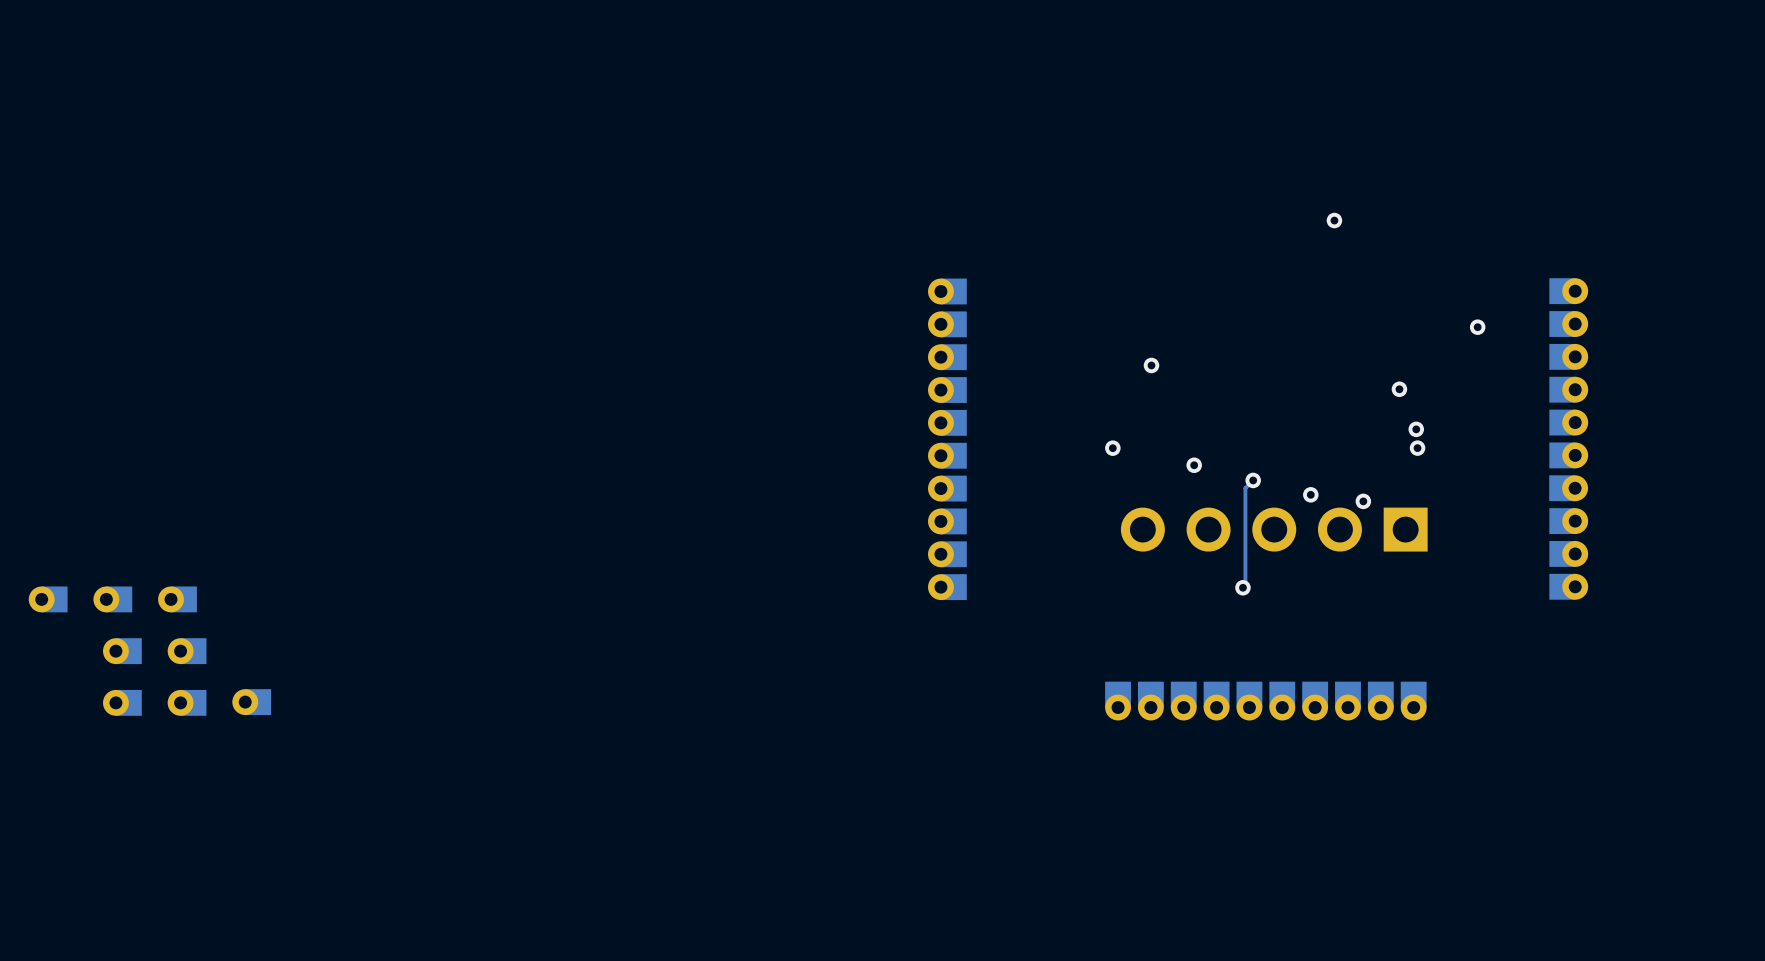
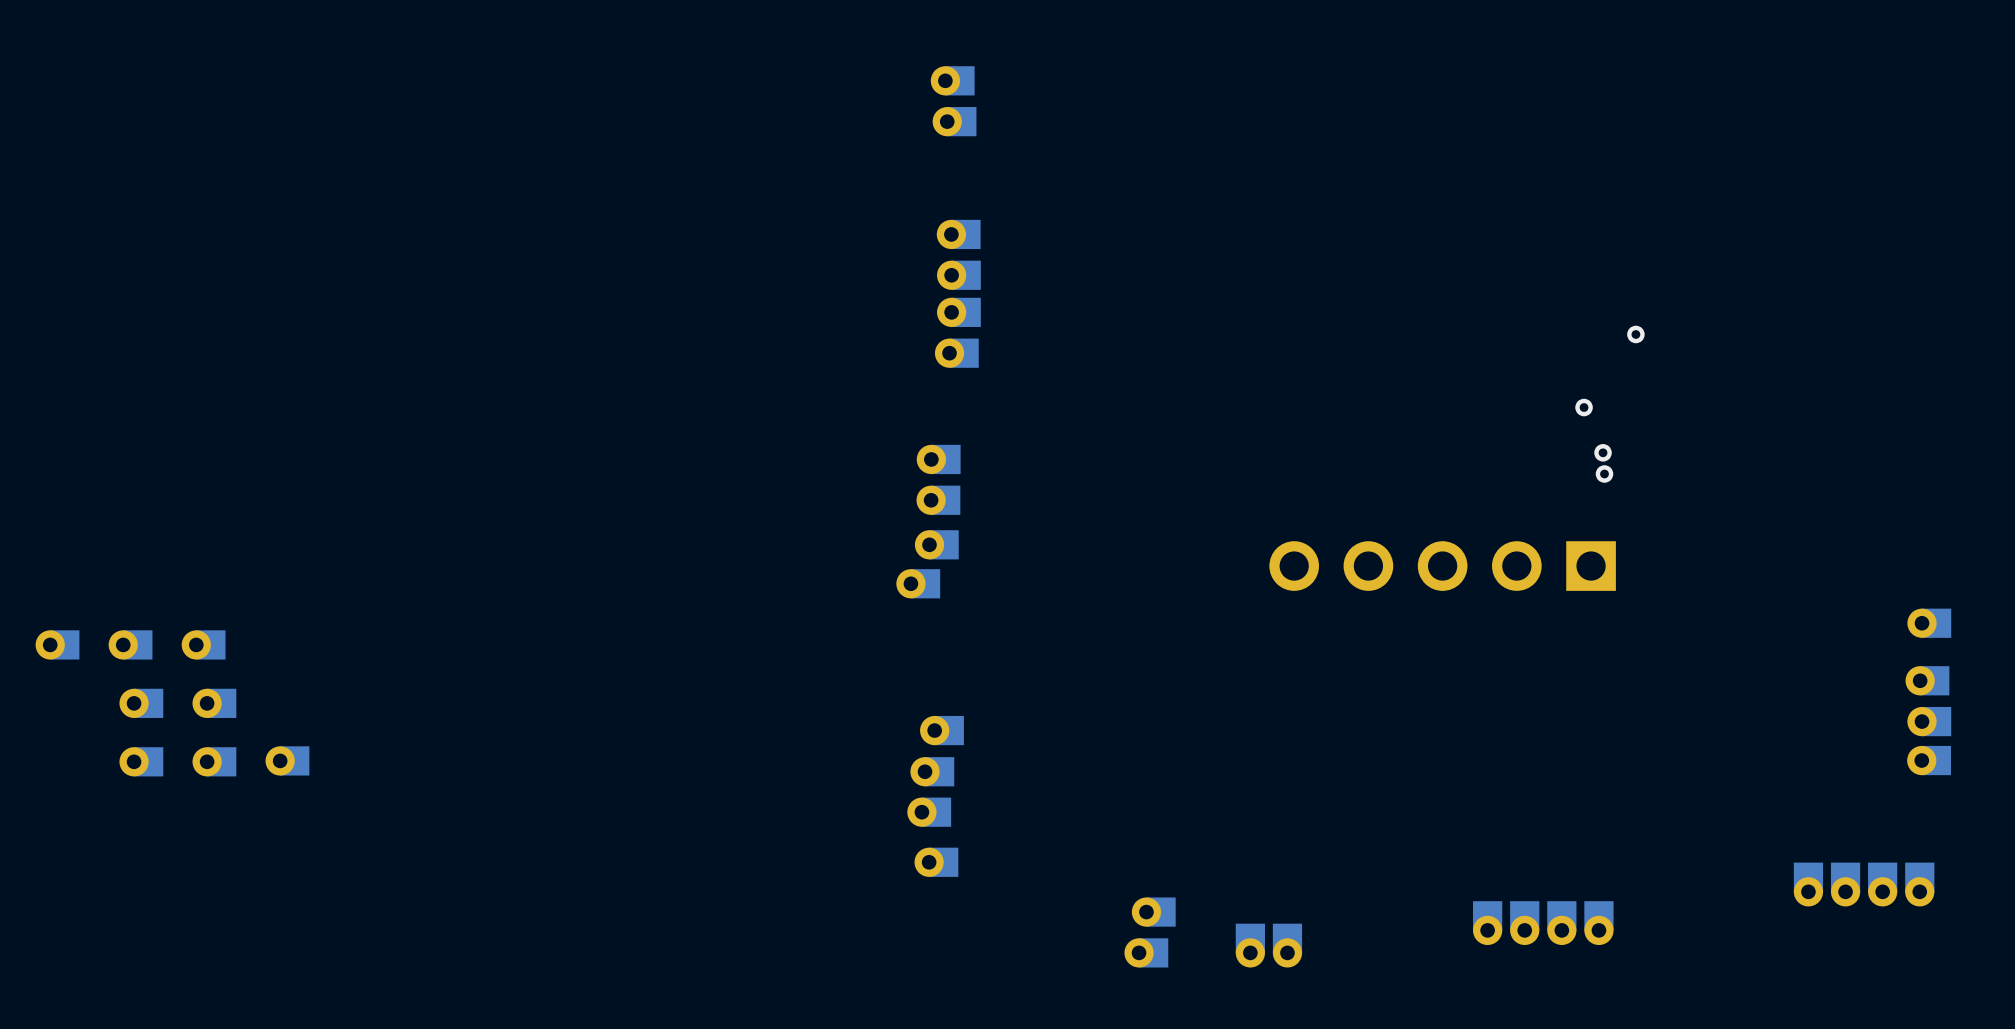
part: none -> (952, 80)
part: none -> (954, 121)
via: (1334, 220) -> none
part: none -> (958, 234)
part: none -> (958, 275)
part: (947, 291) -> none
part: (1568, 291) -> none
part: none -> (958, 312)
part: (947, 324) -> none
part: (1568, 324) -> none
via position: (1477, 327) -> (1635, 334)
part: none -> (956, 353)
part: (1568, 356) -> none
part: (947, 357) -> none
via: (1151, 365) -> none
part: (1568, 389) -> none
part: (947, 390) -> none
part: (947, 422) -> none
part: (1568, 422) -> none
part: none -> (938, 459)
via: (1112, 448) -> none
part: (947, 455) -> none
part: (1568, 455) -> none
via: (1194, 465) -> none
part: none -> (938, 500)
track: (1253, 480) (1245, 488) (1245, 585) (1242, 587) -> none
via: (1253, 480) -> none
part: (947, 488) -> none
part: (1568, 488) -> none
via: (1310, 494) -> none
via: (1363, 501) -> none
part: none -> (936, 544)
part: (947, 521) -> none
part: (1568, 521) -> none
part: none -> (918, 583)
part: (1568, 553) -> none
part: (947, 554) -> none
part: none -> (1929, 623)
part: (1568, 586) -> none
part: (947, 587) -> none
via: (1242, 587) -> none
part: none -> (1927, 680)
part: none -> (1929, 721)
part: none -> (941, 730)
part: (1118, 701) -> none
part: (1150, 701) -> none
part: (1183, 701) -> none
part: (1216, 701) -> none
part: (1249, 701) -> none
part: (1282, 701) -> none
part: (1315, 701) -> none
part: (1347, 701) -> none
part: (1380, 701) -> none
part: (1413, 701) -> none
part: none -> (1929, 760)
part: none -> (932, 771)
part: none -> (929, 812)
part: none -> (936, 862)
part: none -> (1808, 884)
part: none -> (1845, 884)
part: none -> (1882, 884)
part: none -> (1919, 884)
part: none -> (1153, 912)
part: none -> (1487, 923)
part: none -> (1524, 923)
part: none -> (1561, 923)
part: none -> (1598, 923)
part: none -> (1250, 945)
part: none -> (1287, 945)
part: none -> (1146, 952)

